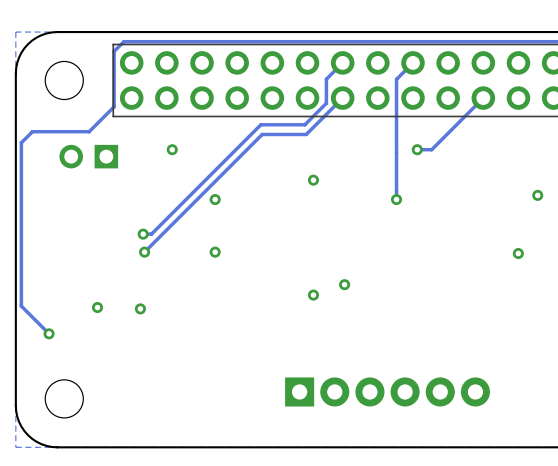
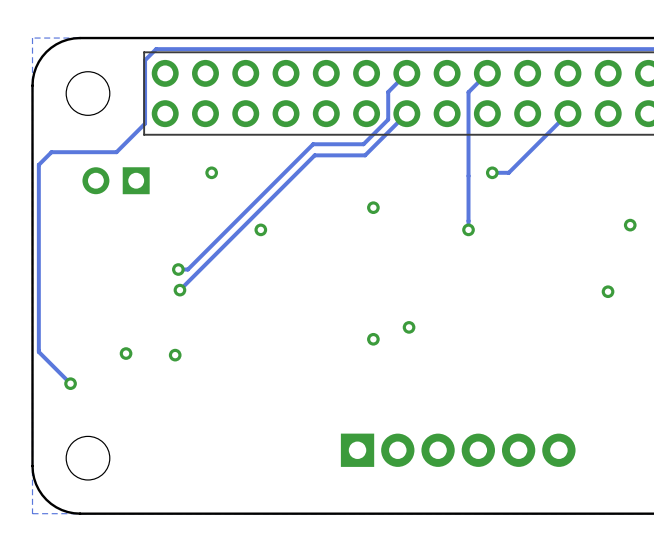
via: (215, 252) -> none

